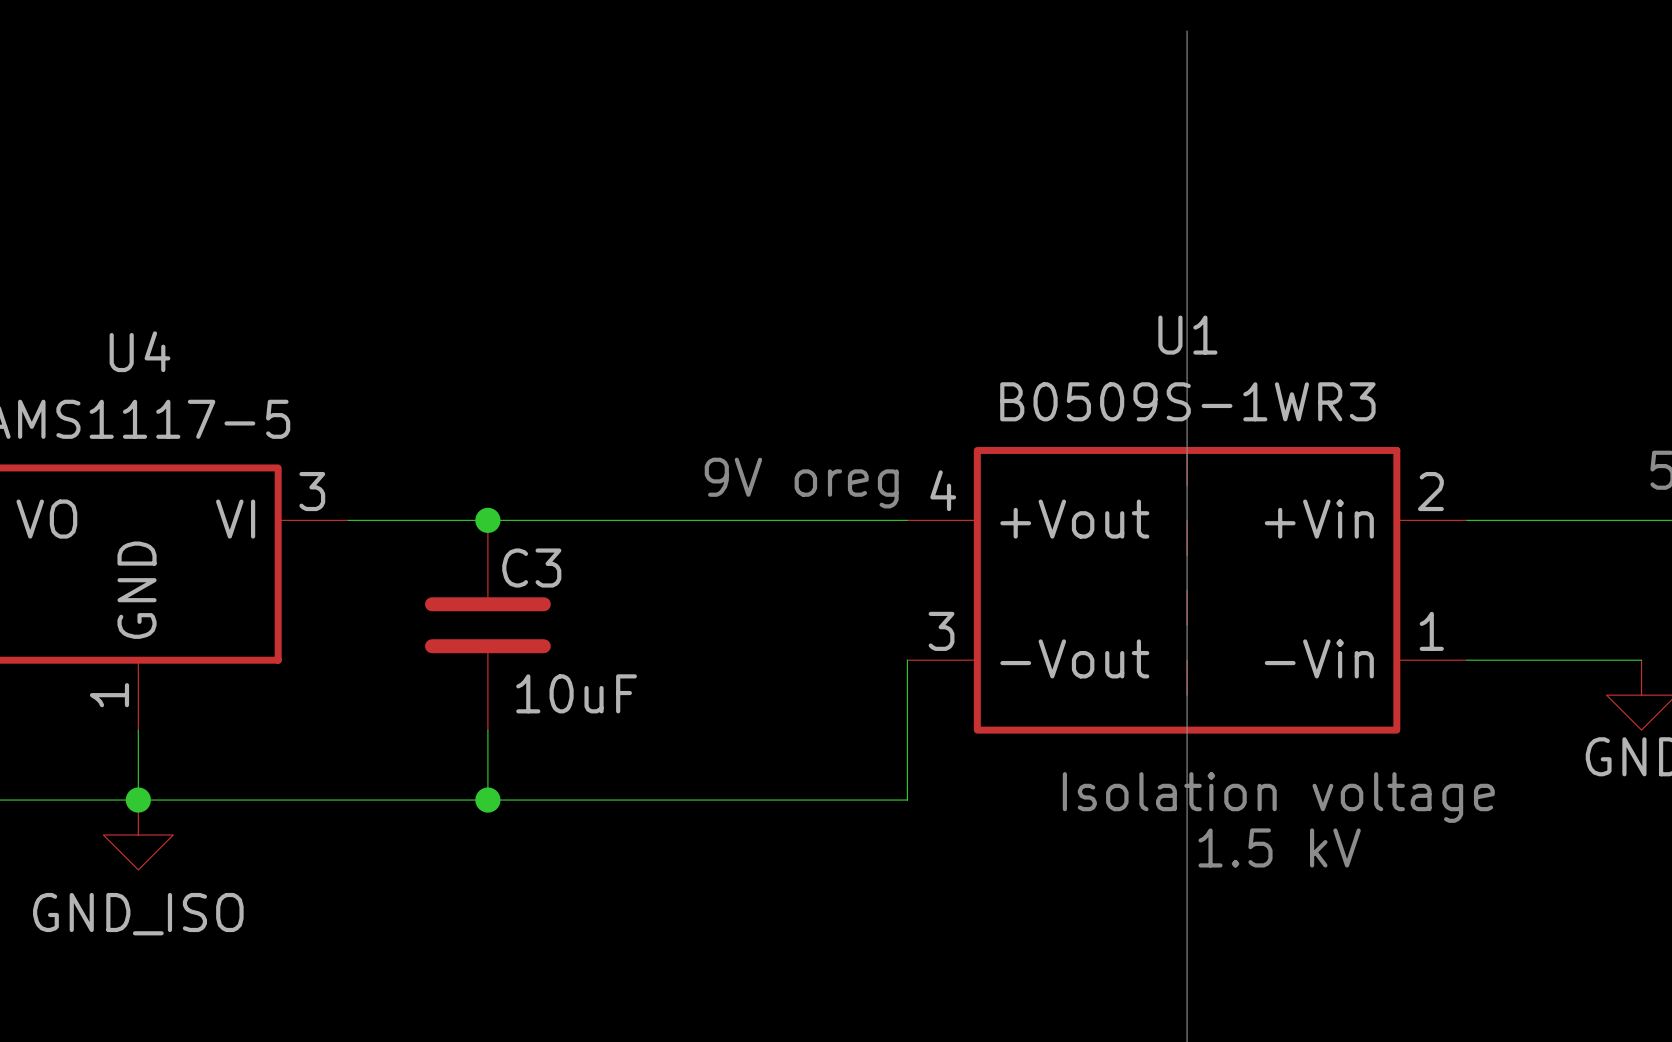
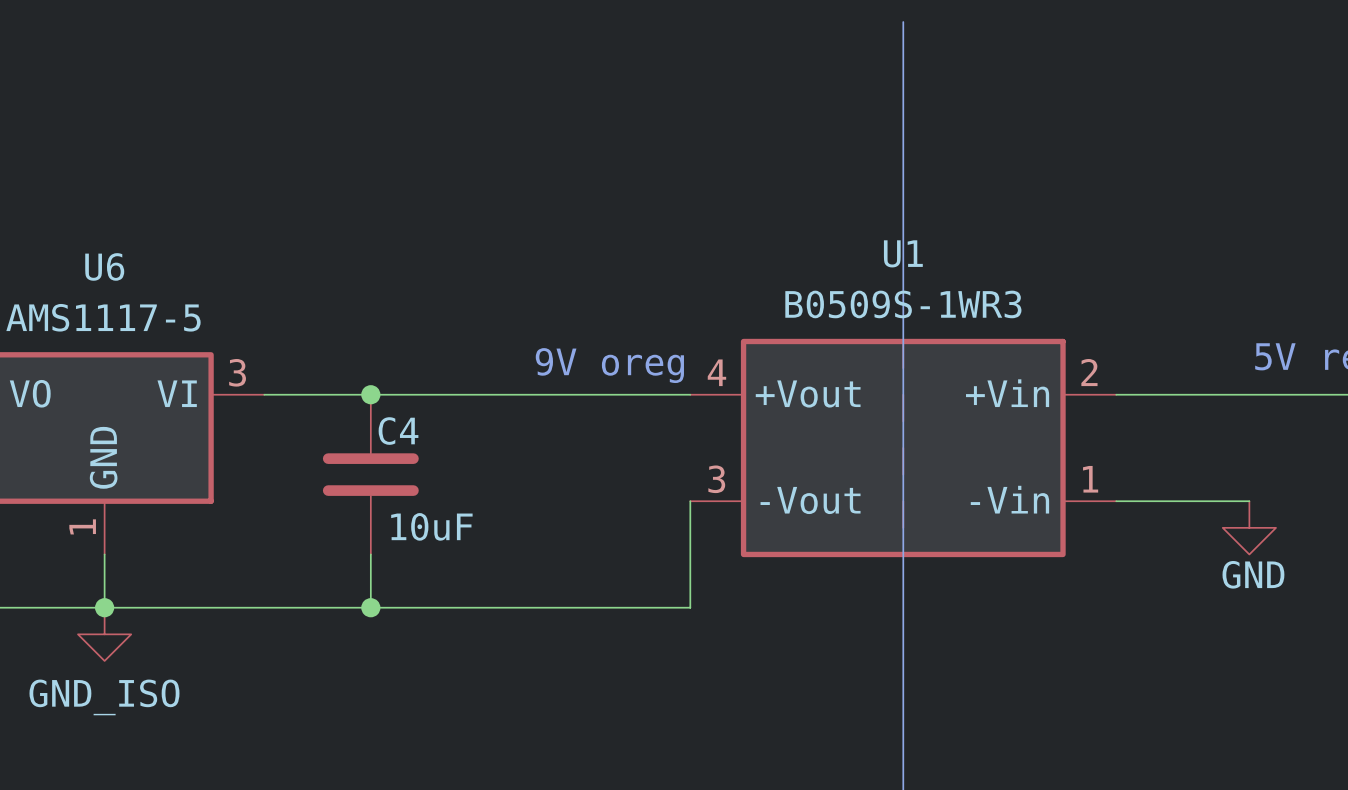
U4 name: U4 (140, 351) -> U6 (104, 266)
C3 name: C3 (531, 568) -> C4 (398, 431)
text: Isolation voltage (1278, 797) -> none
text: 1.5 kV (1279, 847) -> none

